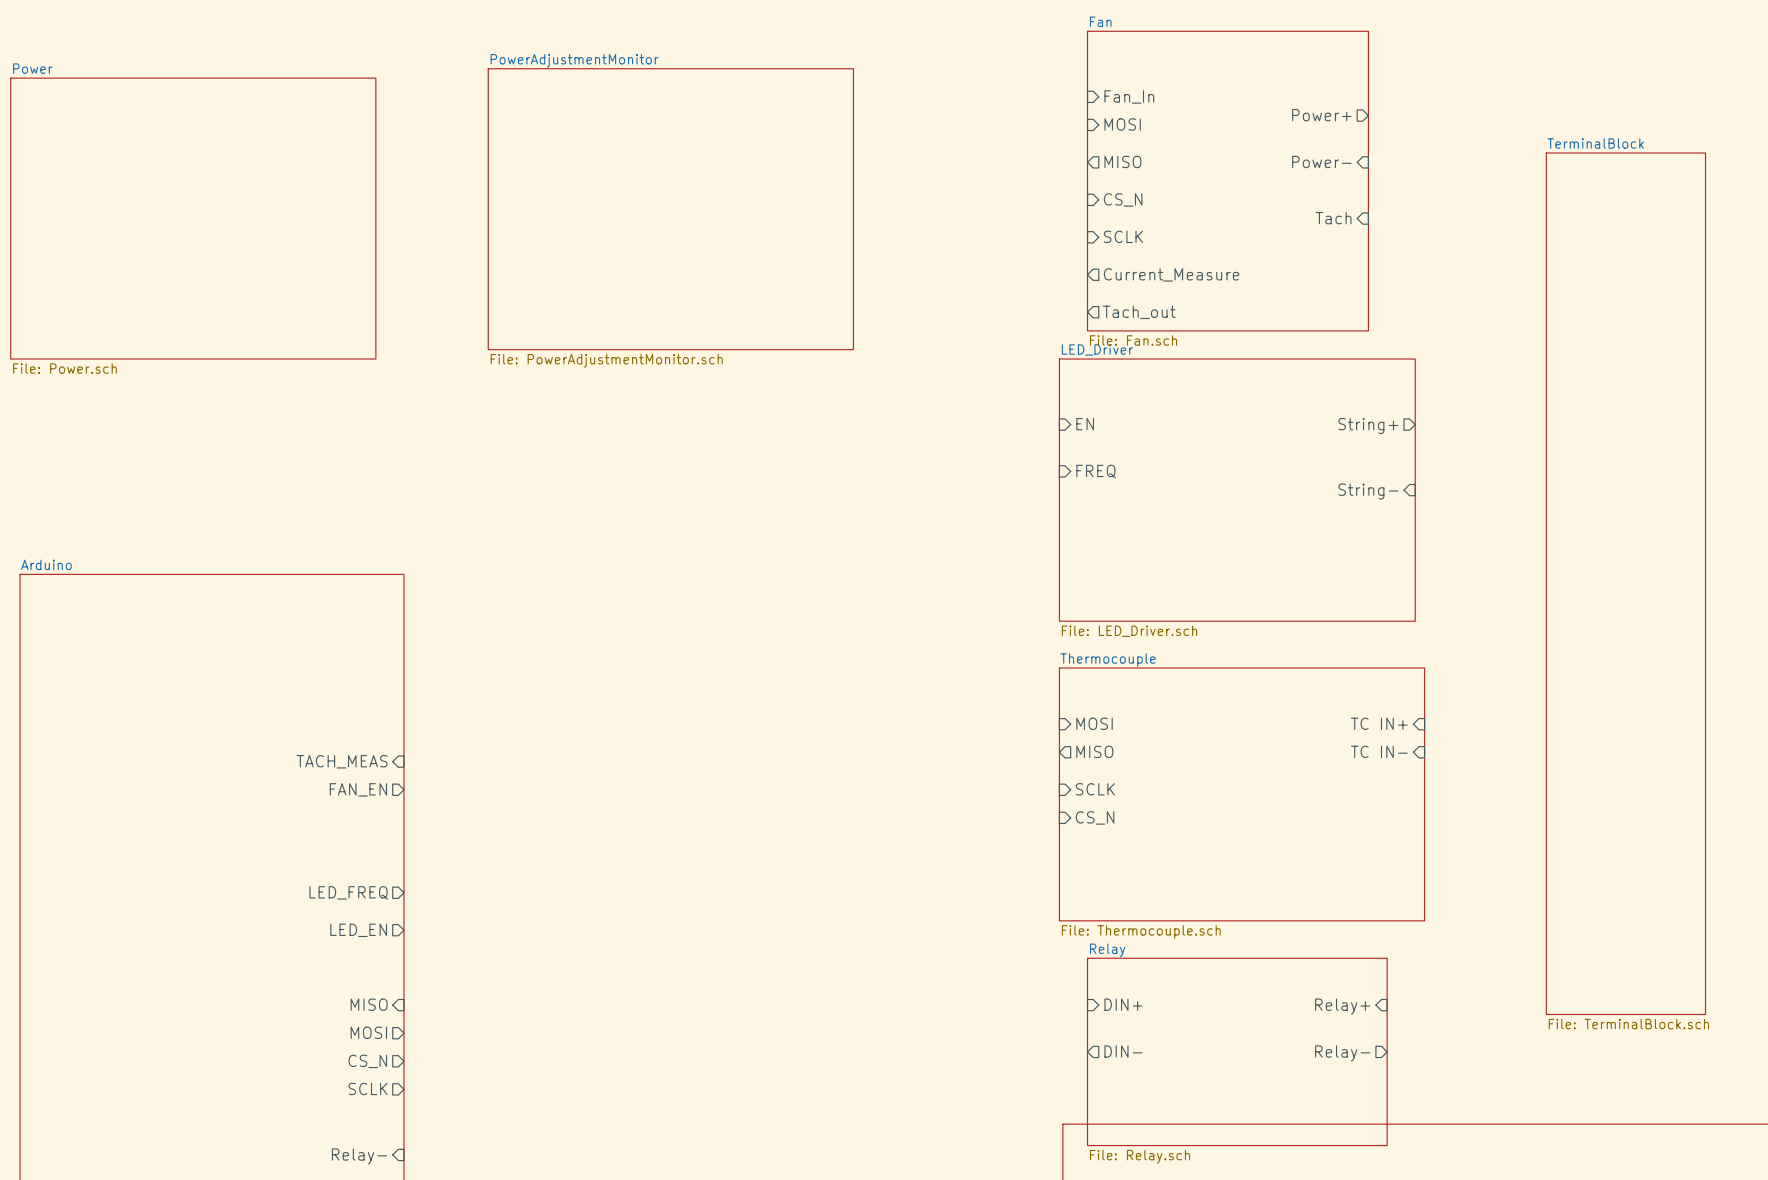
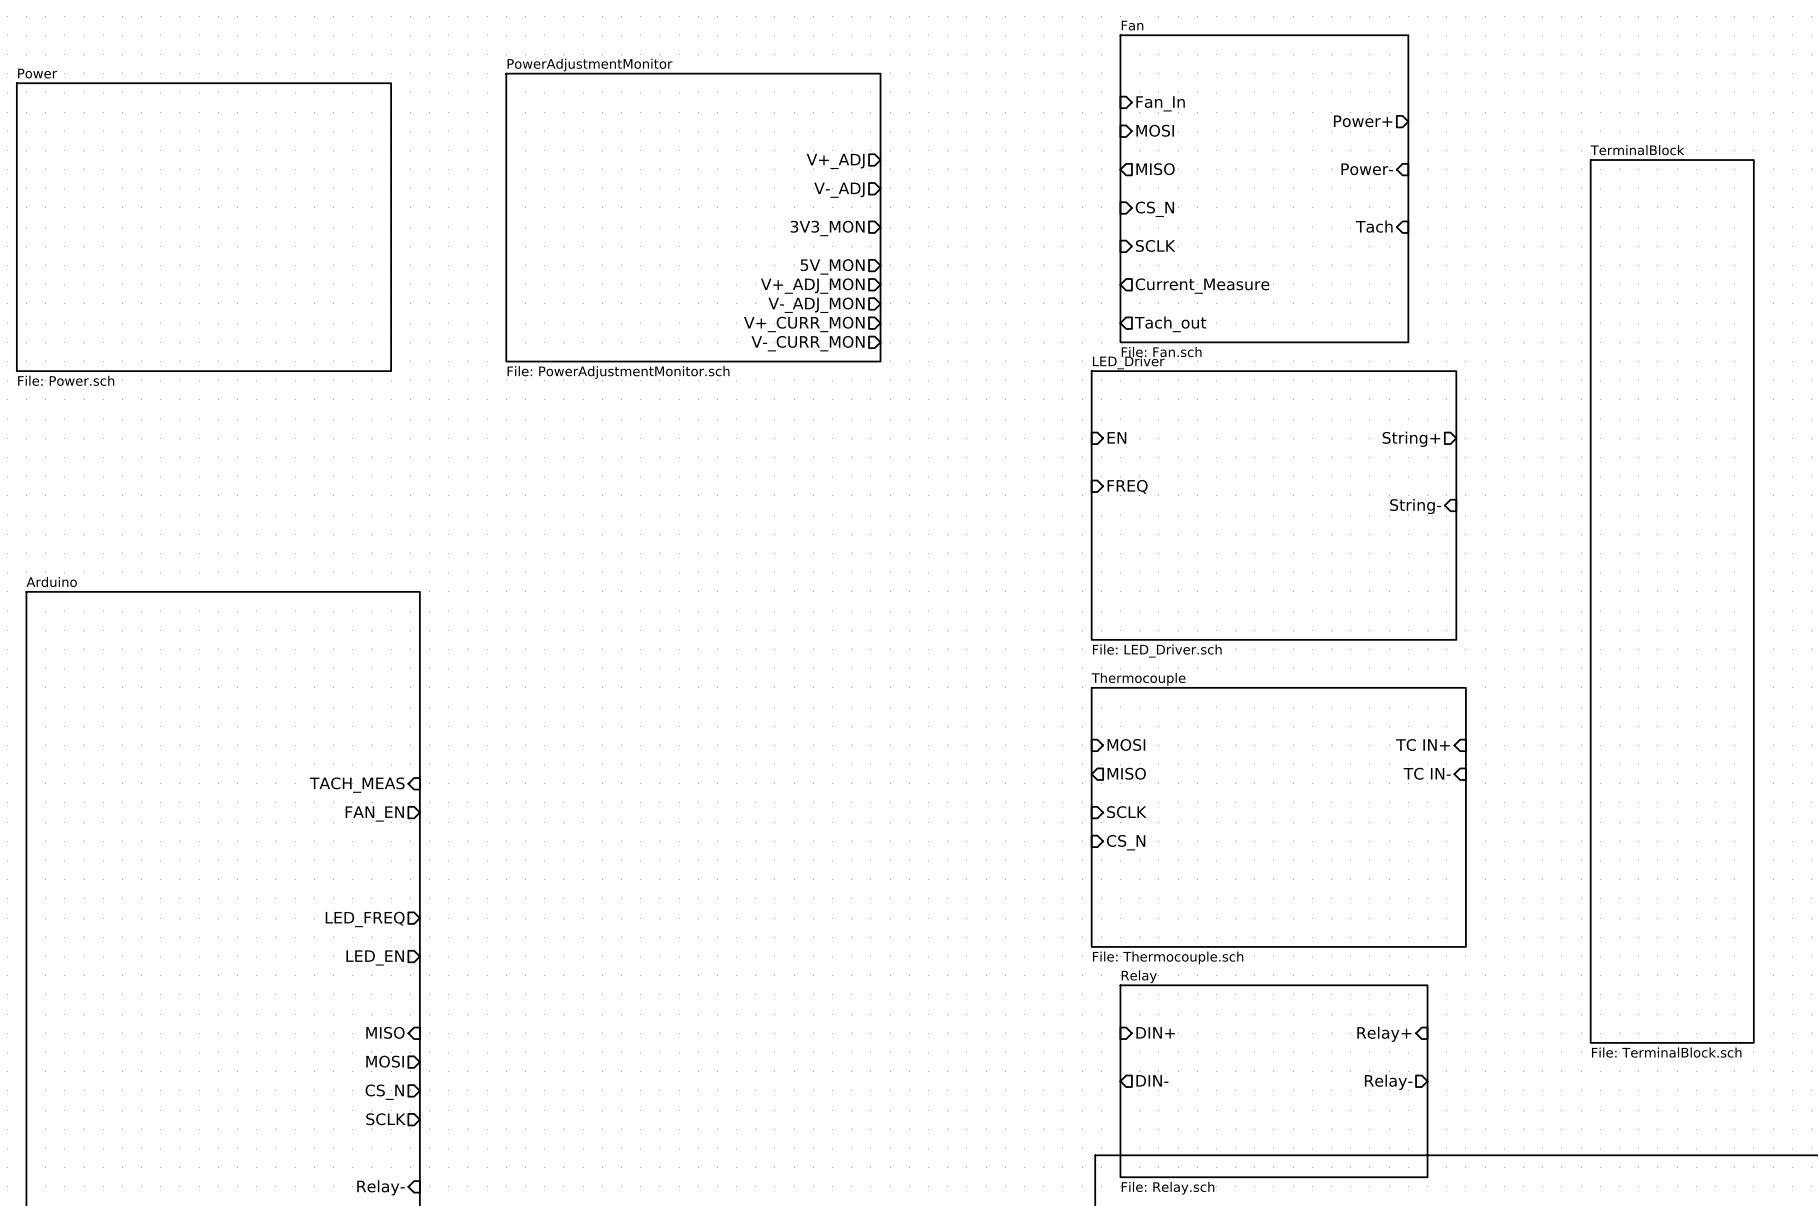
sheet pin: none -> V+_ADJ (835, 161)
sheet pin: none -> V-_ADJ (839, 190)
sheet pin: none -> 3V3_MON (827, 228)
sheet pin: none -> 5V_MON (832, 266)
sheet pin: none -> V+_ADJ_MON (812, 286)
sheet pin: none -> V-_ADJ_MON (816, 305)
sheet pin: none -> V+_CURR_MON (804, 324)
sheet pin: none -> V-_CURR_MON (808, 343)

